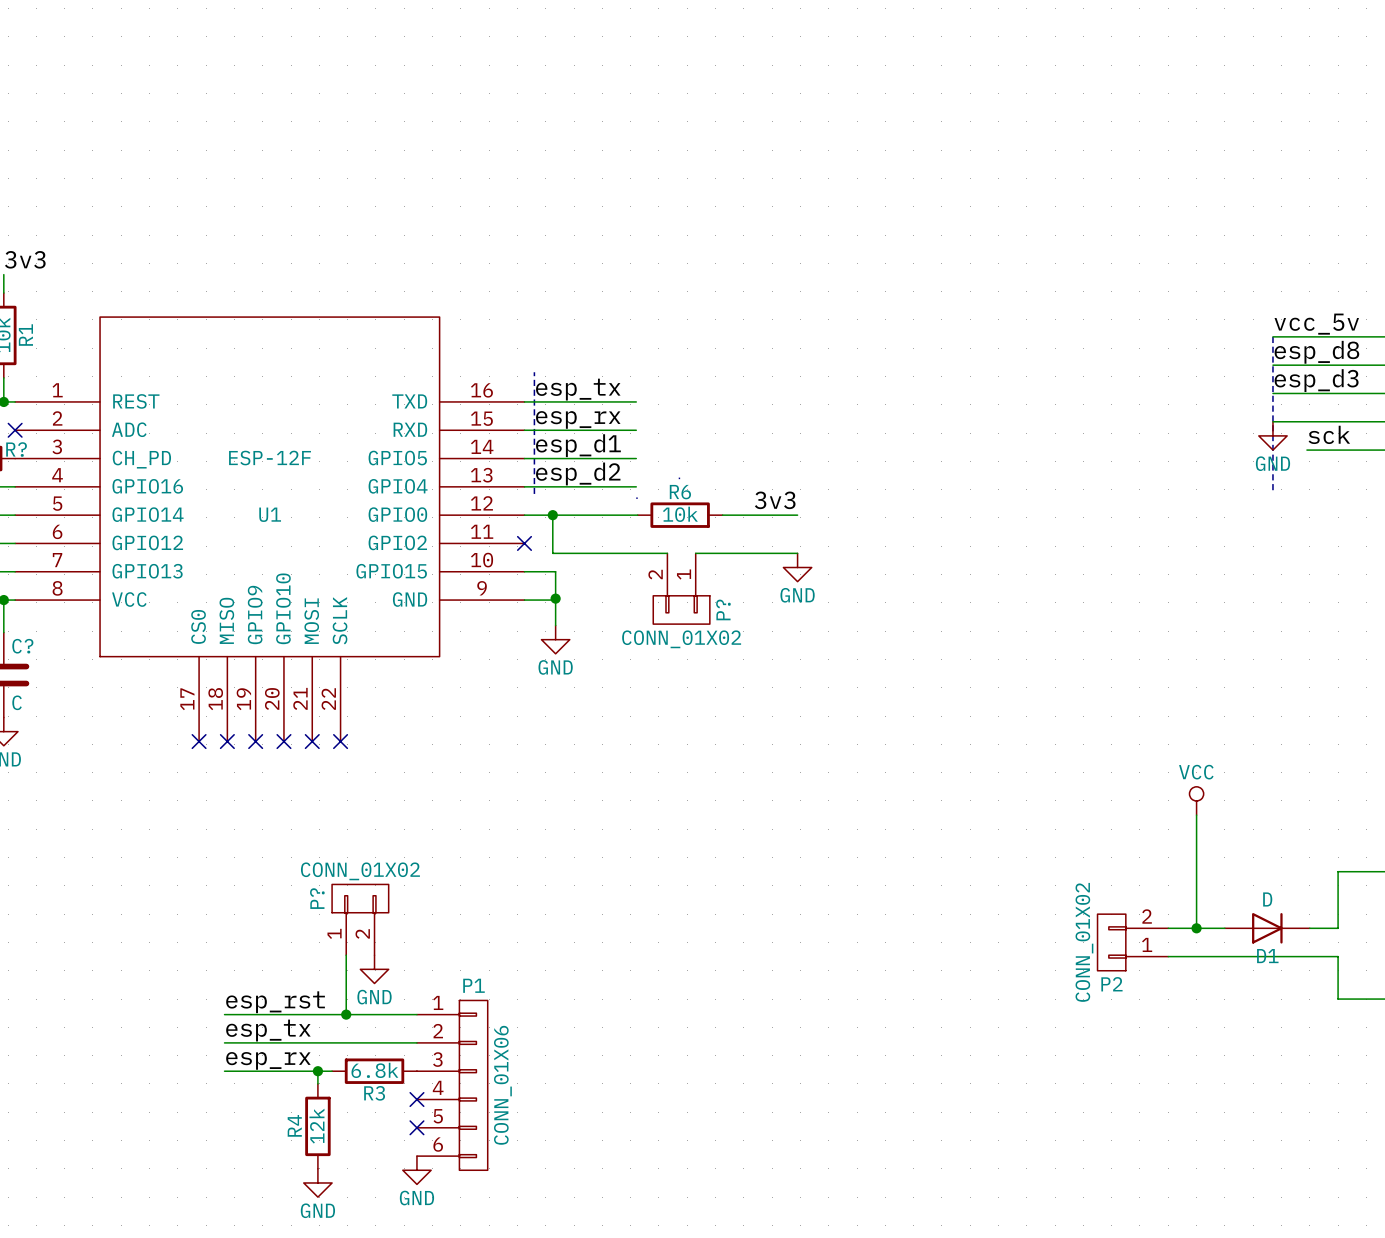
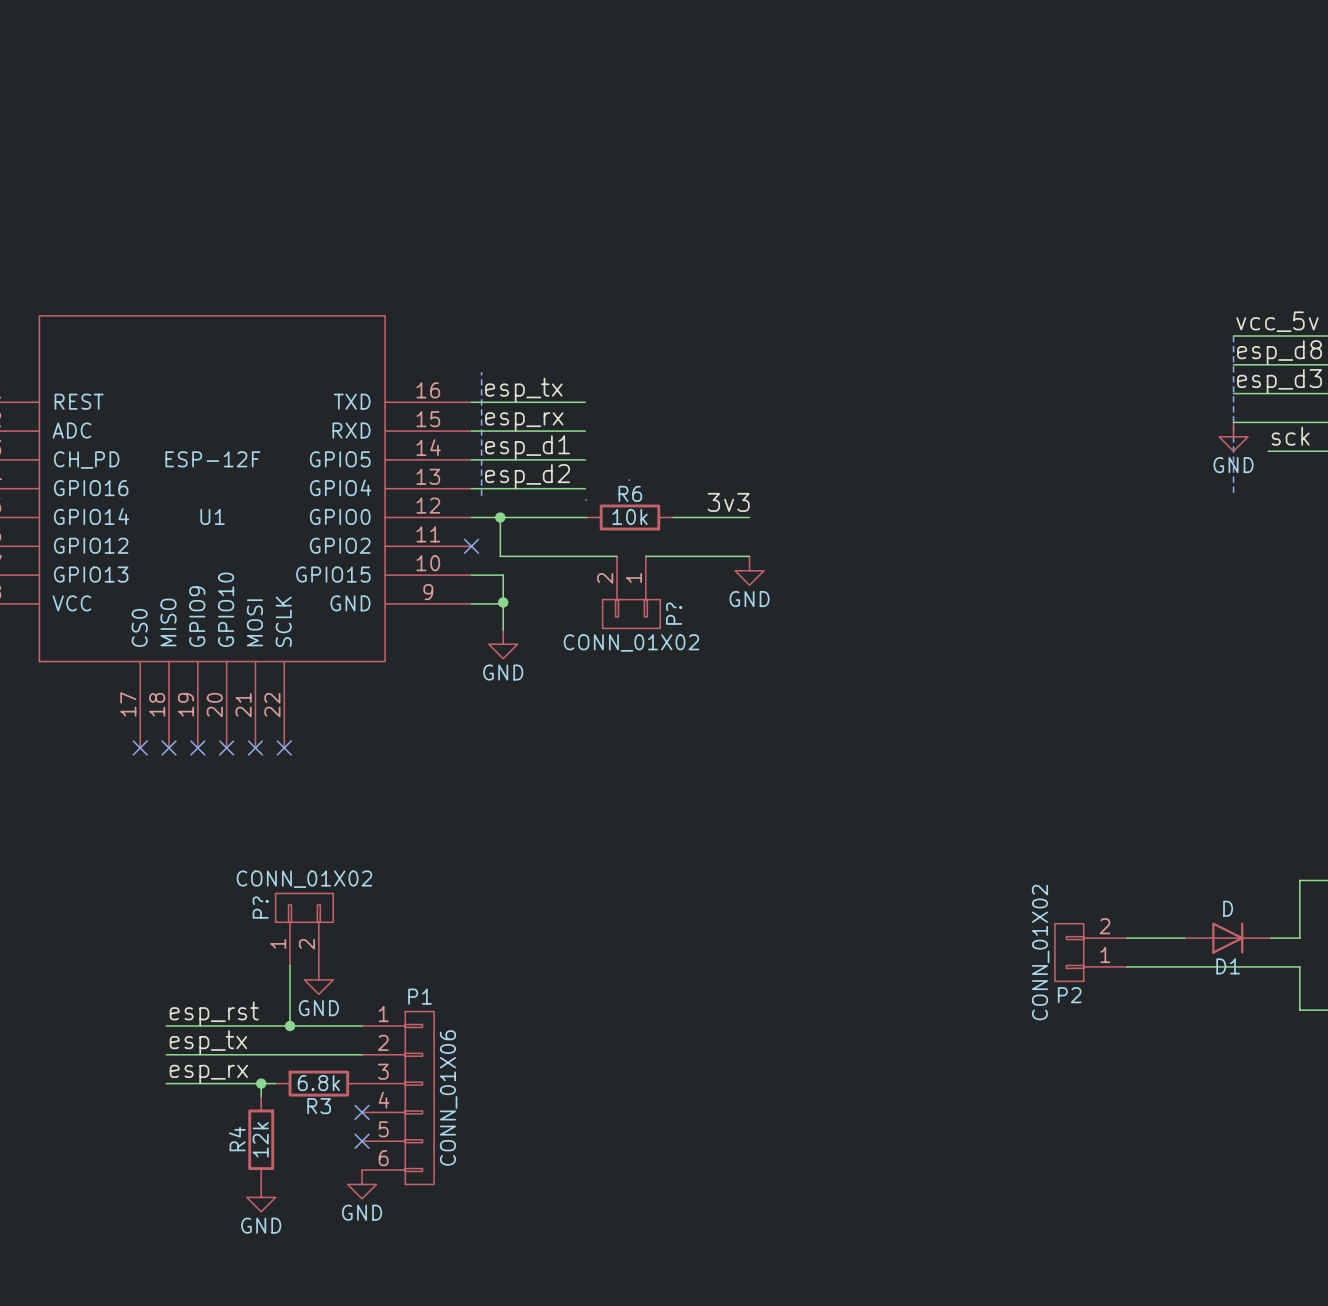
power symbol: VCC (1196, 800) -> none
wire: (1196, 815) (1196, 928) -> none
junction: (1196, 928) -> none

